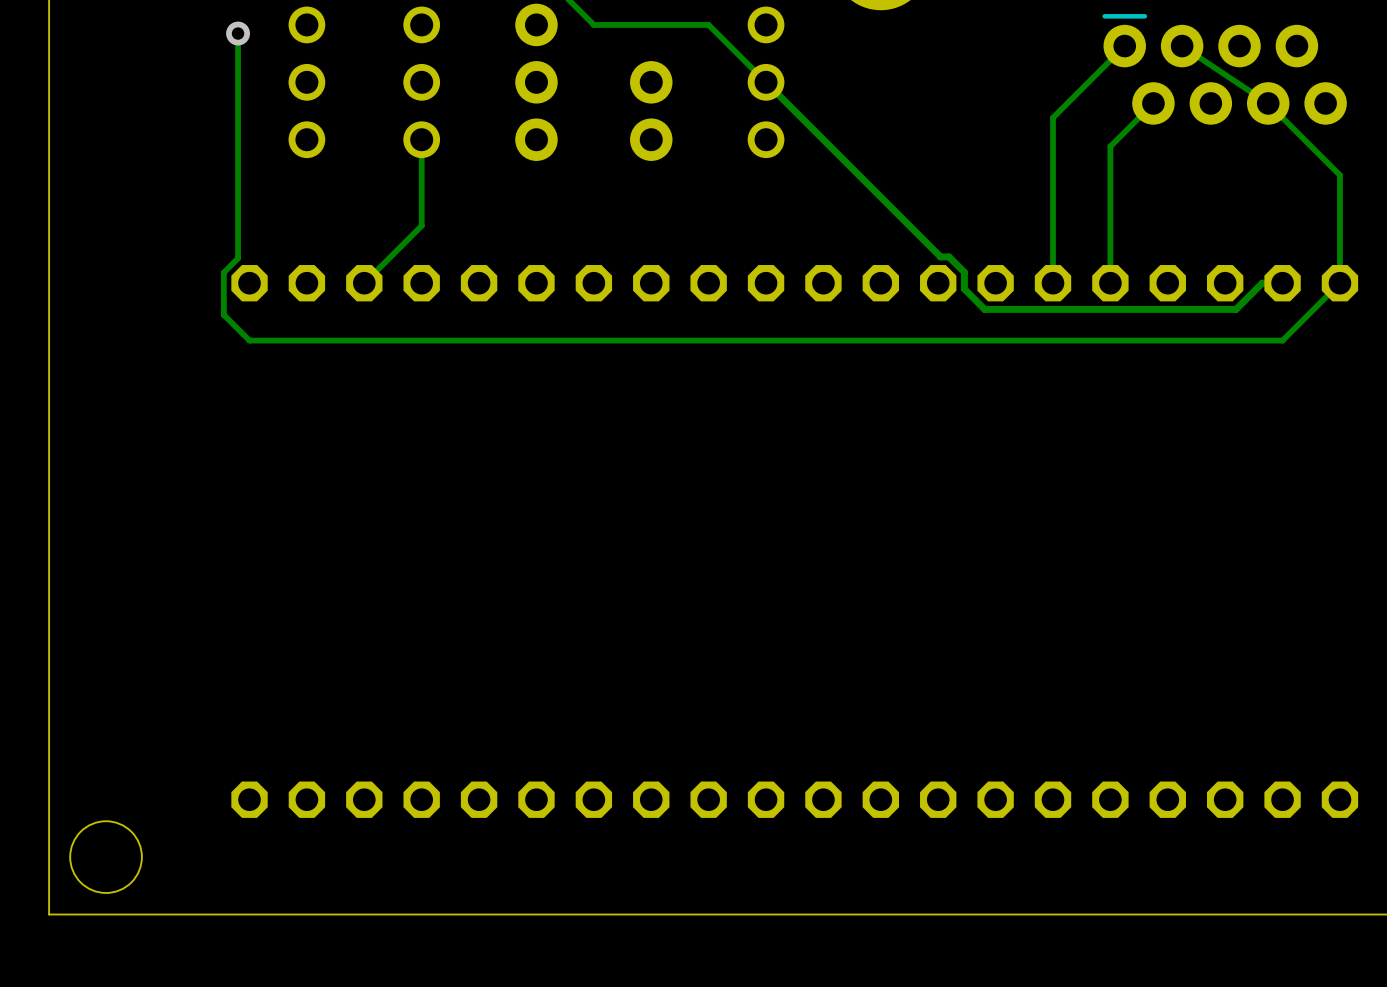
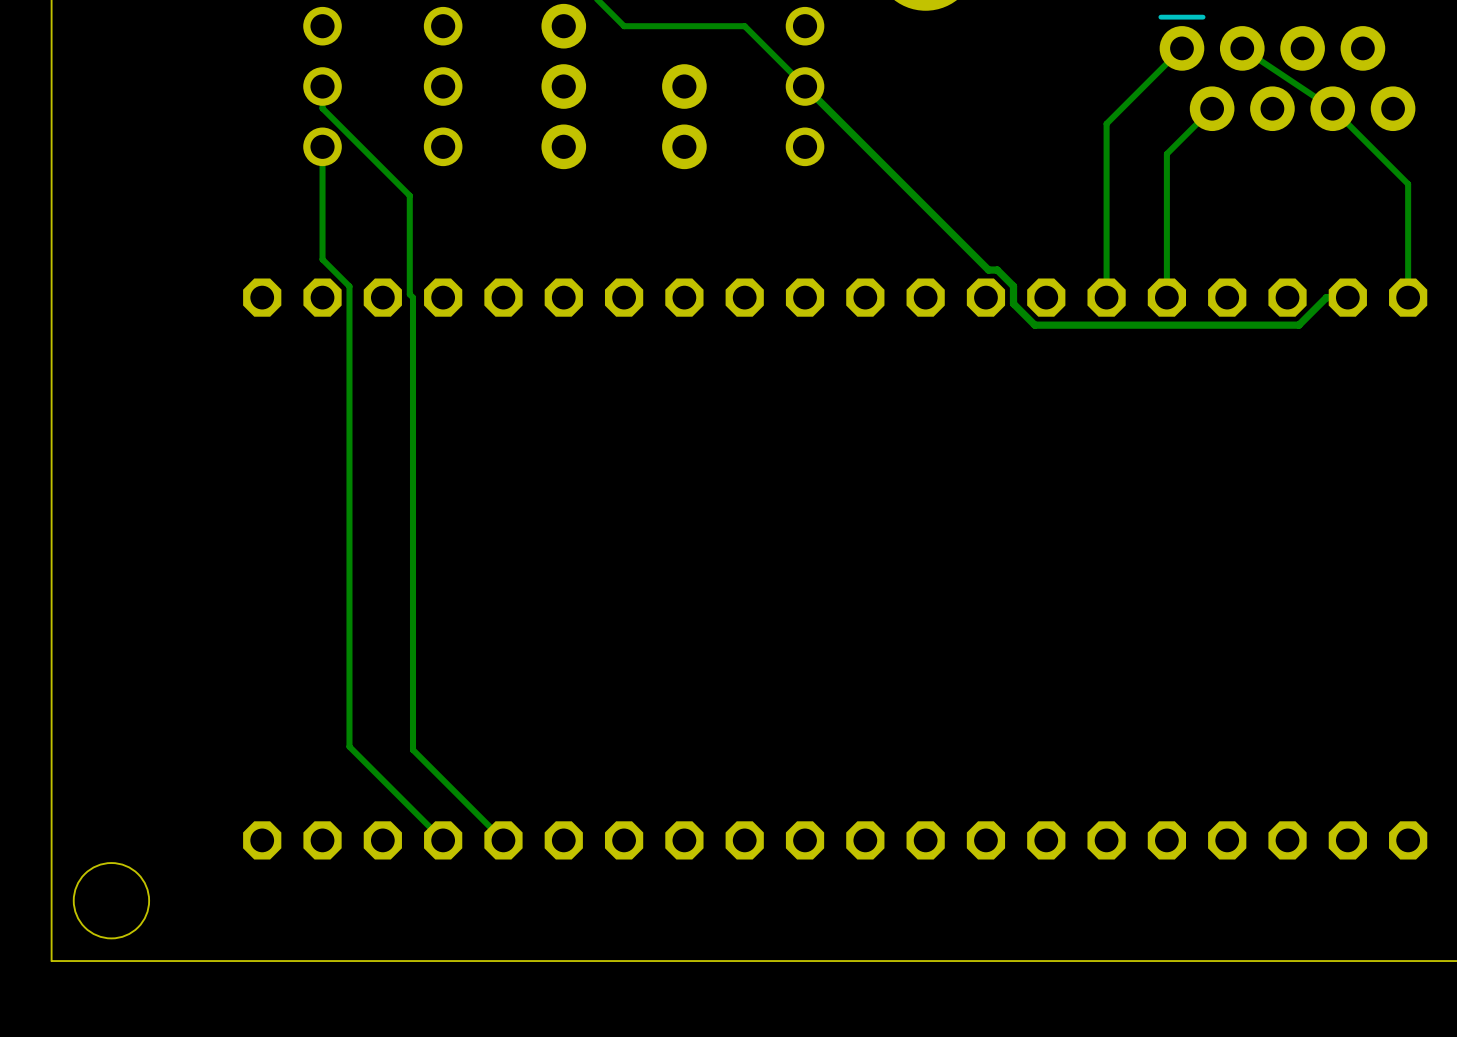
track: (238, 33) (238, 258) (223, 272) (223, 314) (249, 340) (1282, 340) (1339, 283) -> none
via: (238, 33) -> none
track: none -> (322, 86) (322, 108) (409, 195) (409, 294) (413, 297) (413, 749) (503, 840)
track: none -> (322, 146) (322, 259) (349, 286) (349, 746) (443, 840)
track: (421, 139) (421, 225) (364, 283) -> none

